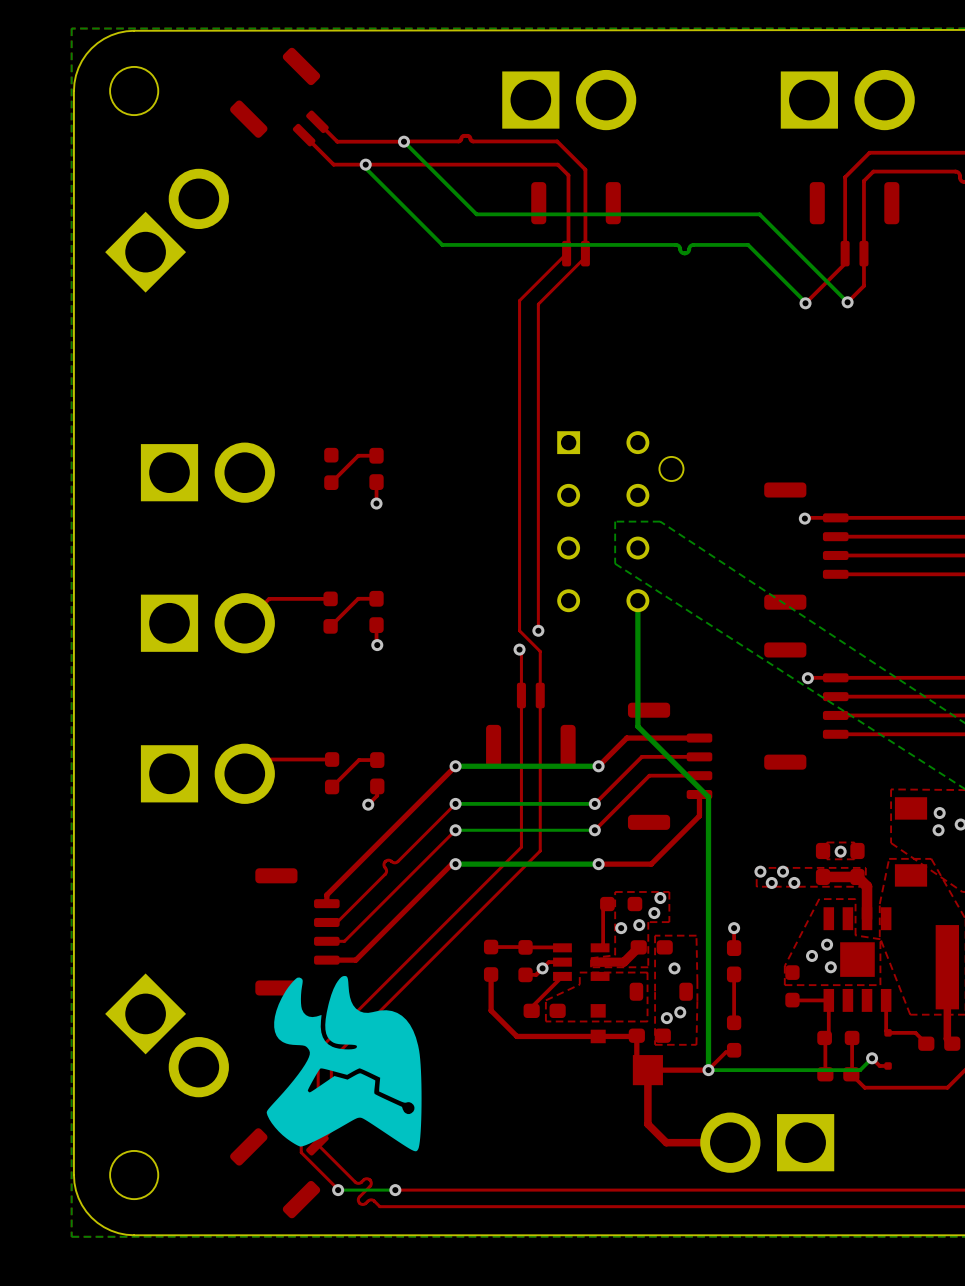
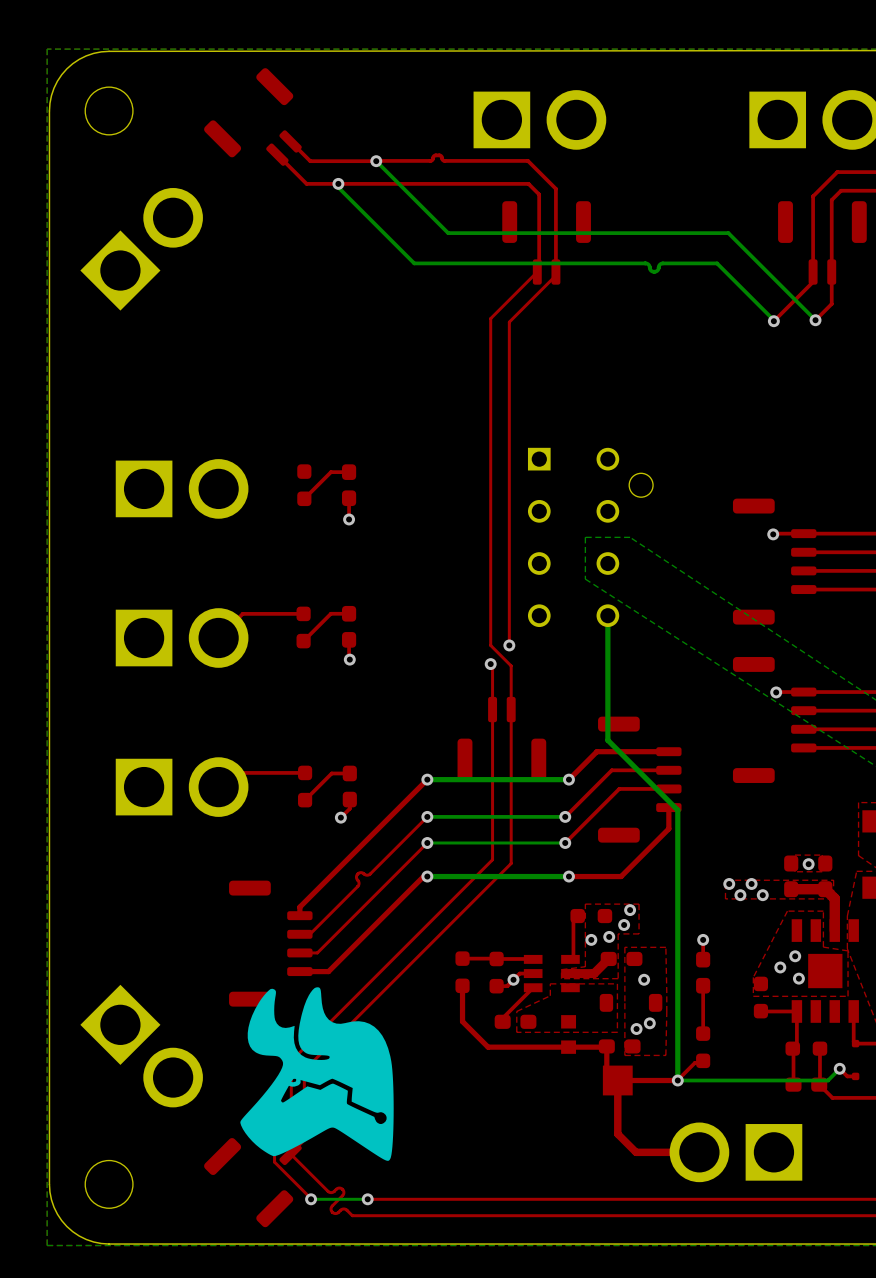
drawing: [266, 975, 422, 1152] -> none
part: none -> (317, 1074)

